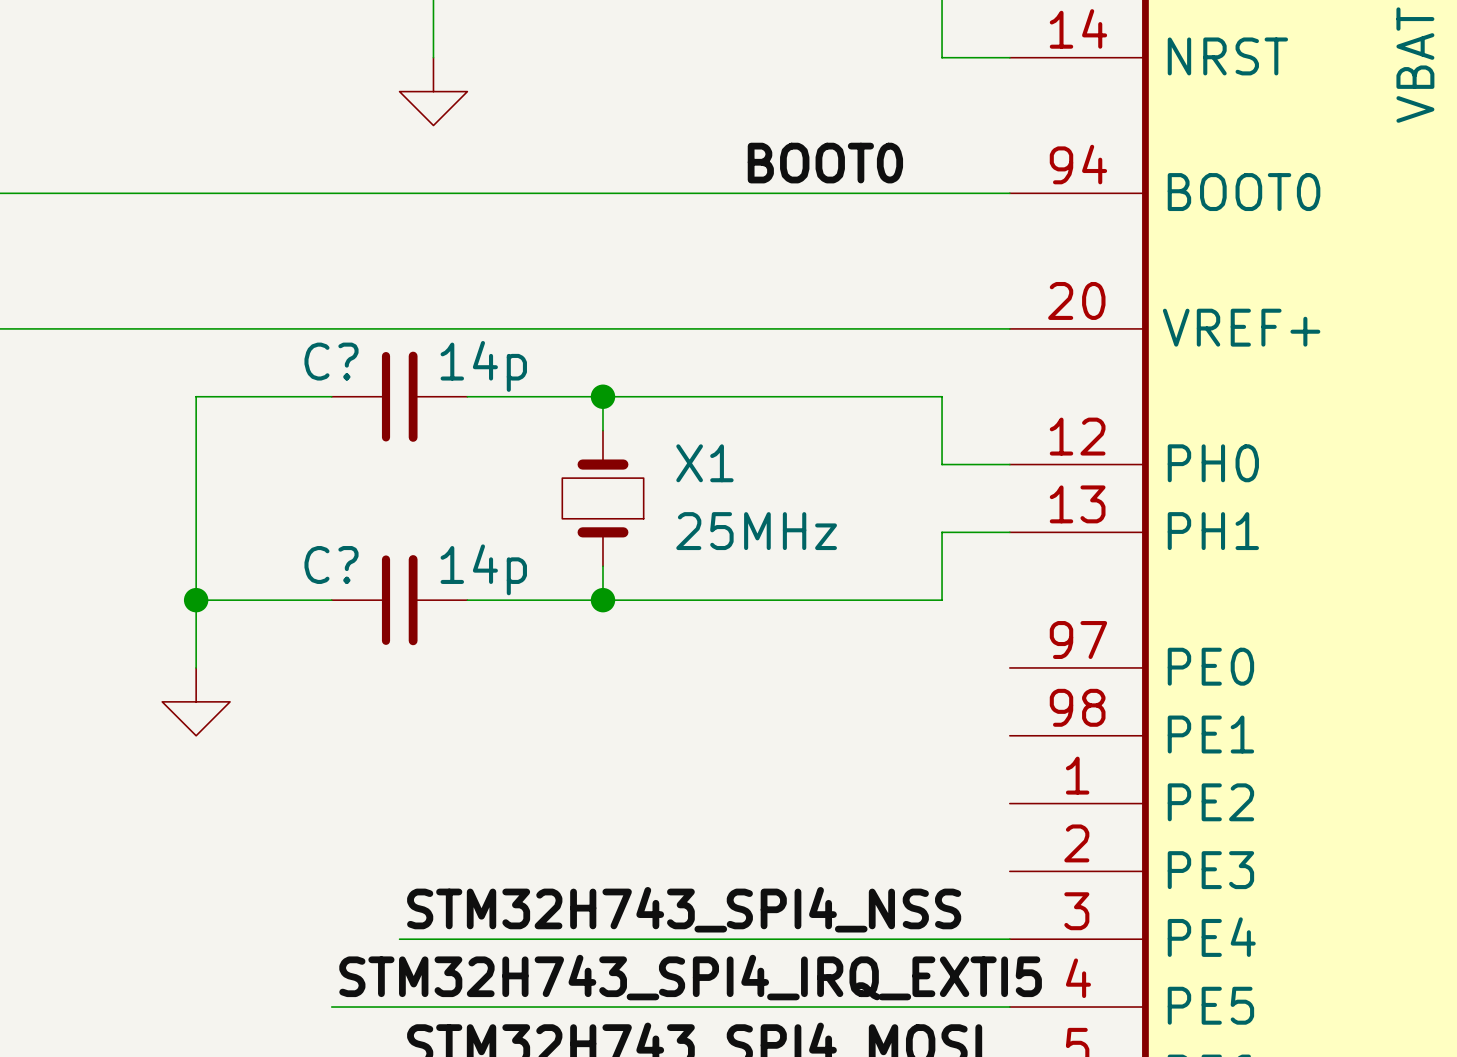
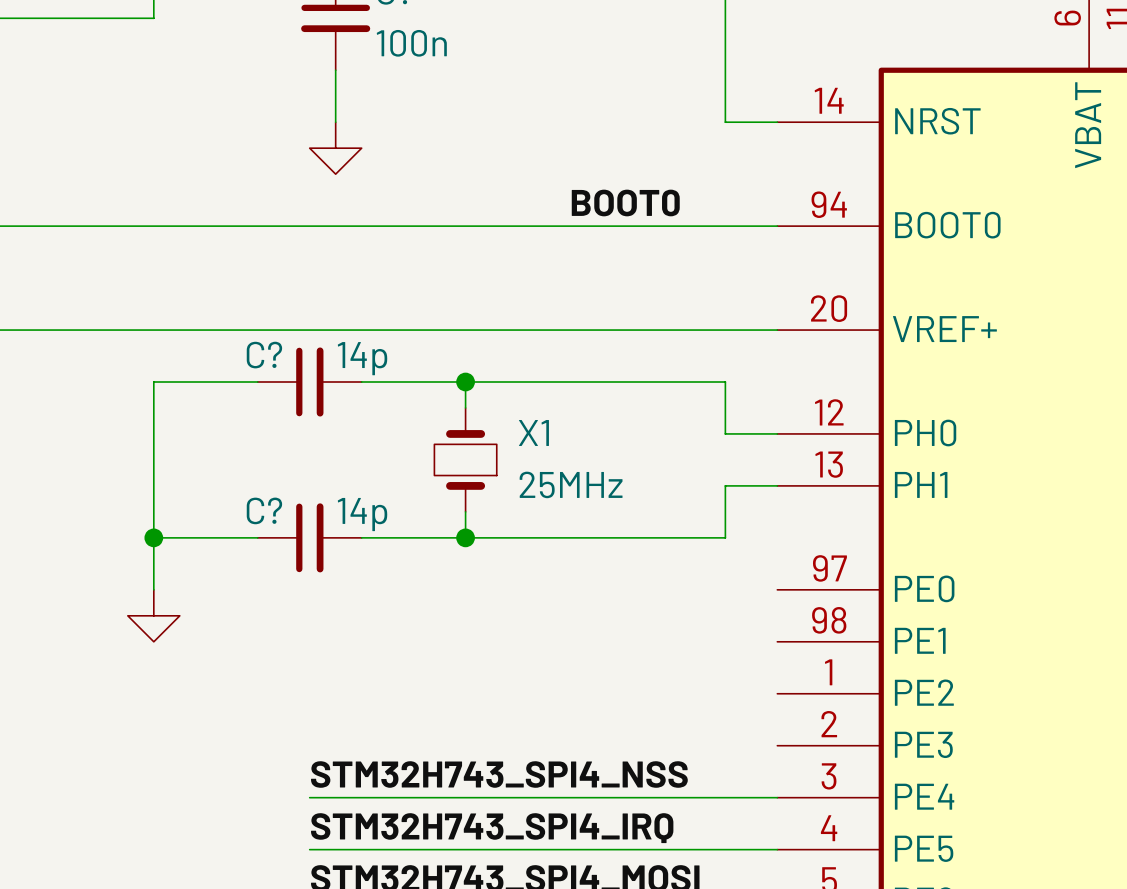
label: STM32H743_SPI4_IRQ_EXTI5 (690, 977) -> STM32H743_SPI4_IRQ (492, 828)
wire: (331, 1007) (399, 1007) -> none

